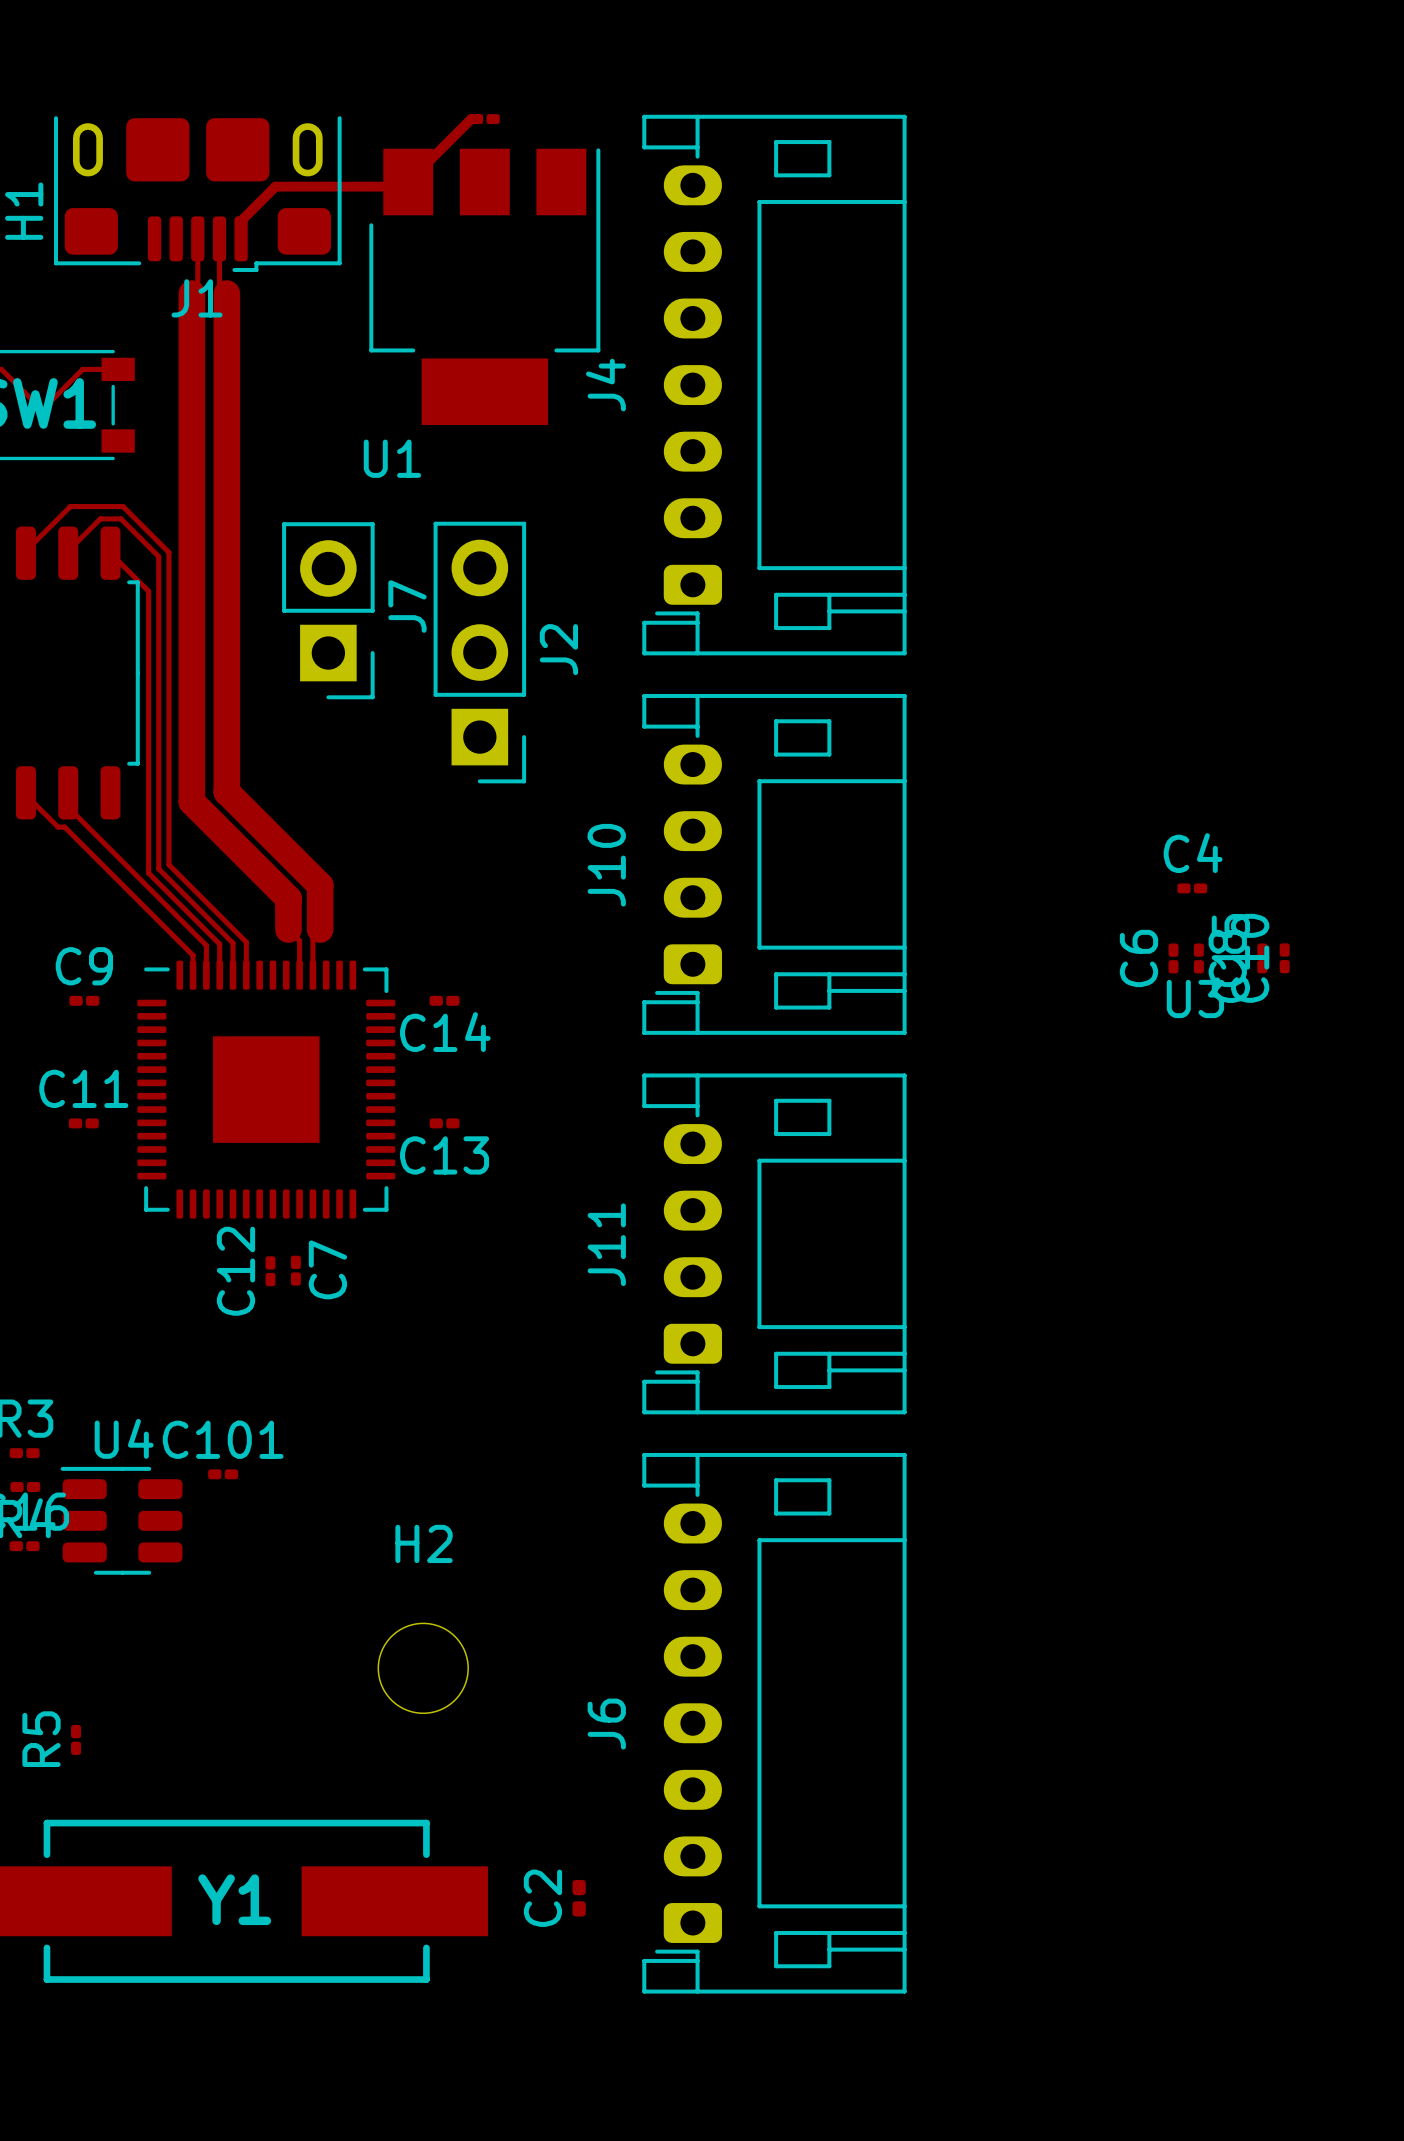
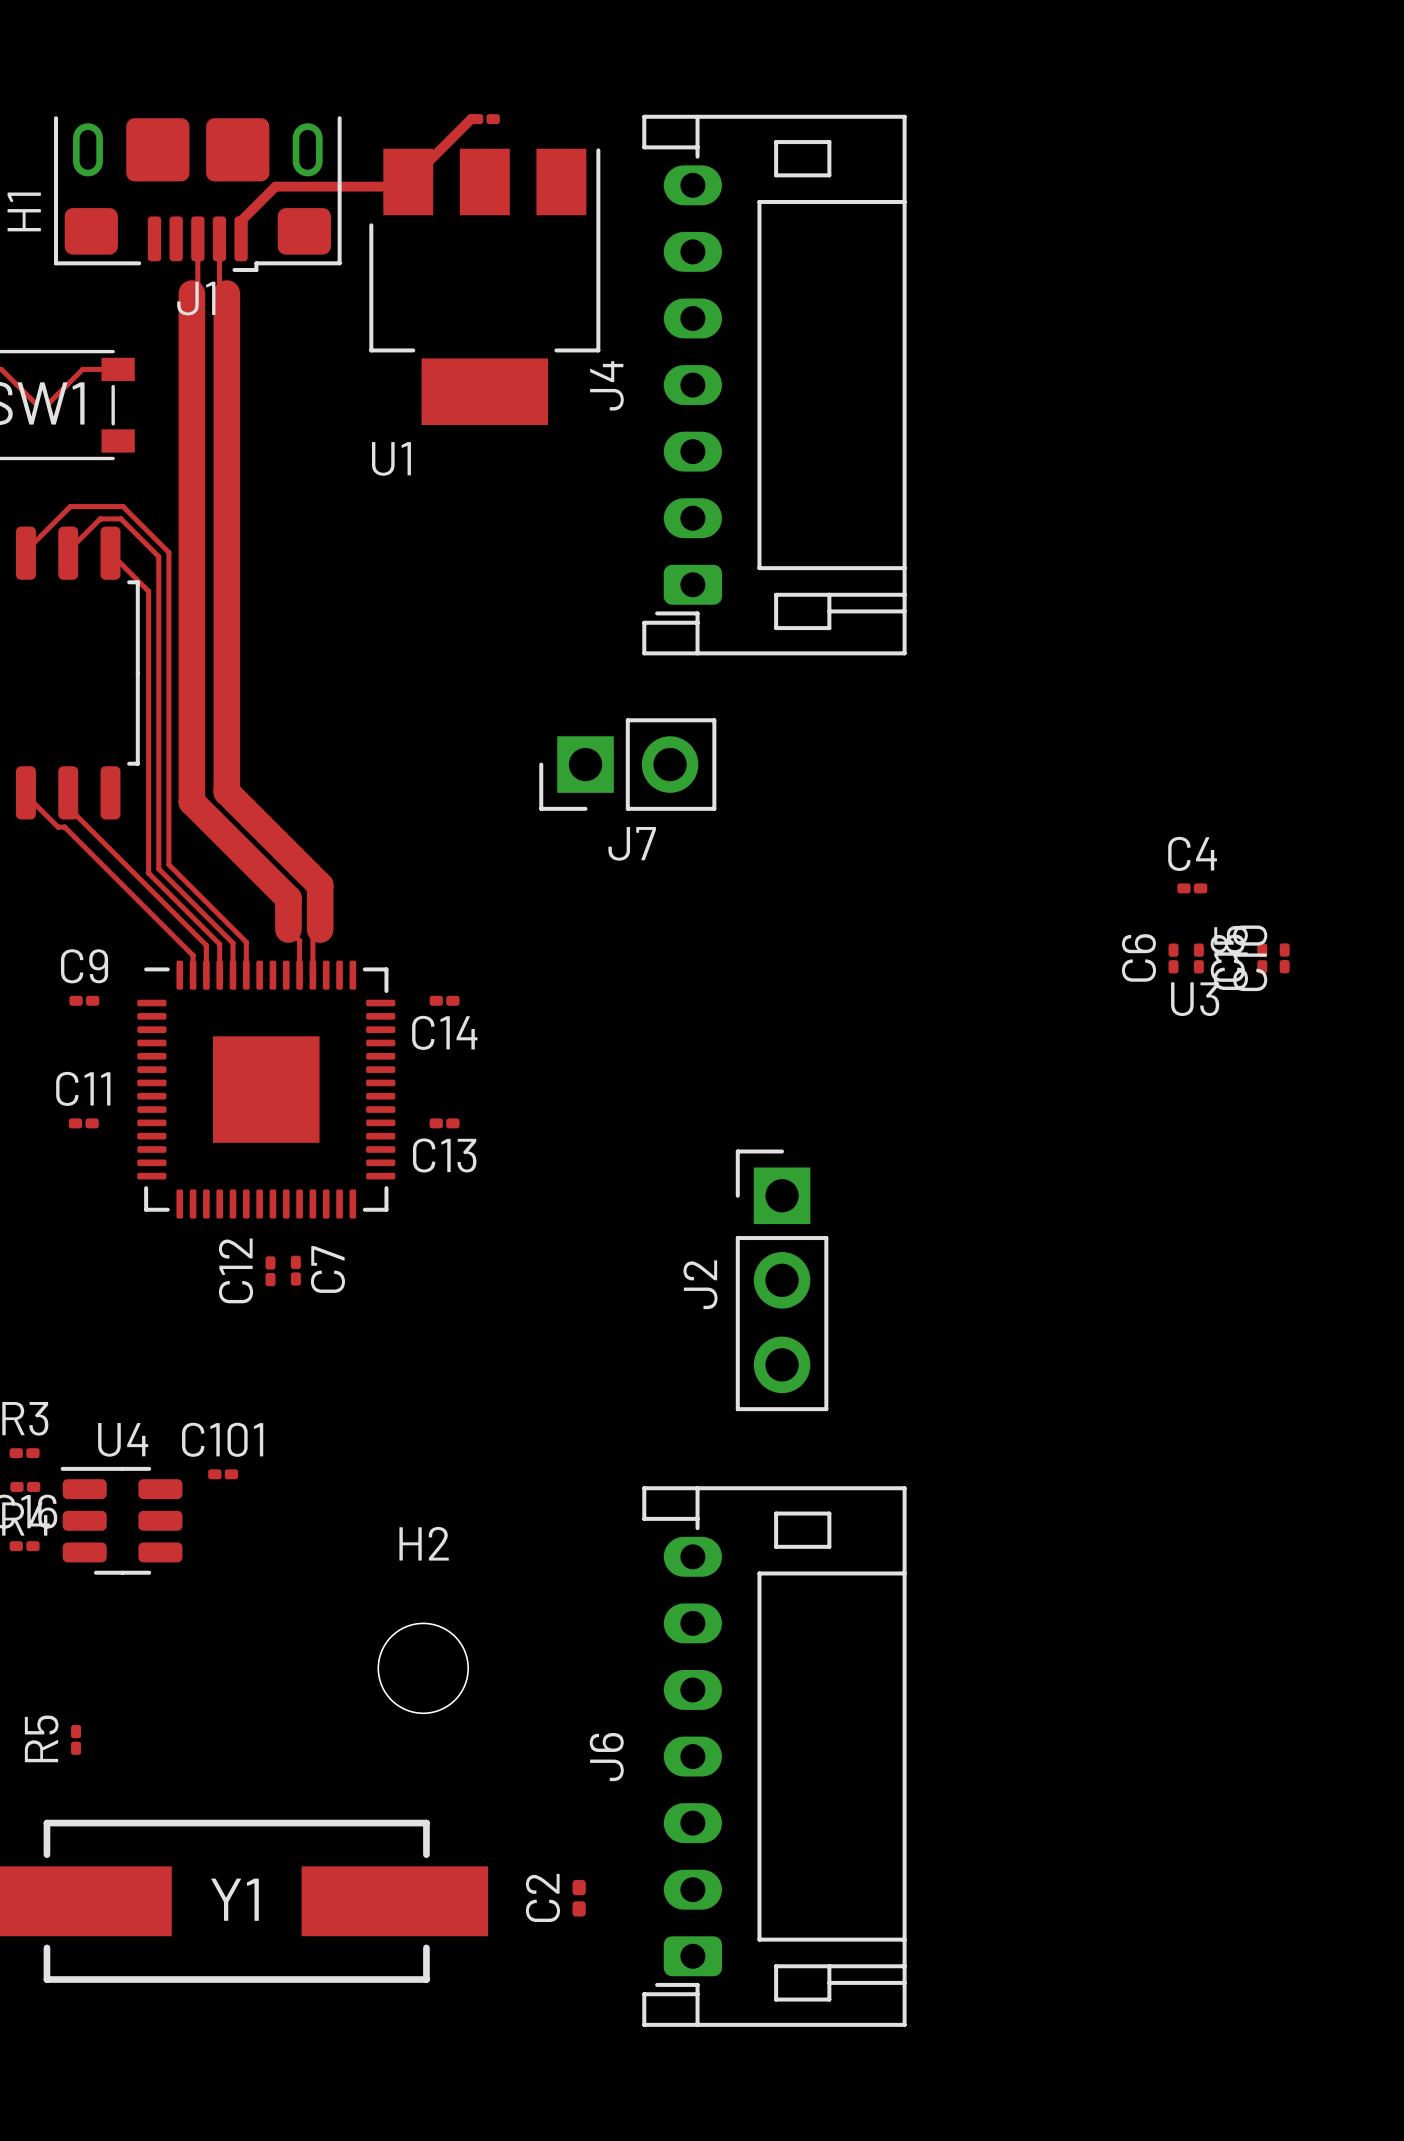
J7 rotation: 0° (328, 610) -> 90° clockwise (627, 764)
J7 position: (328, 610) -> (627, 764)
J2 rotation: 0° (479, 652) -> 180° (782, 1280)
J2 position: (479, 652) -> (782, 1280)
J10: (774, 864) -> none
J11: (774, 1243) -> none
J6 position: (774, 1723) -> (774, 1756)

